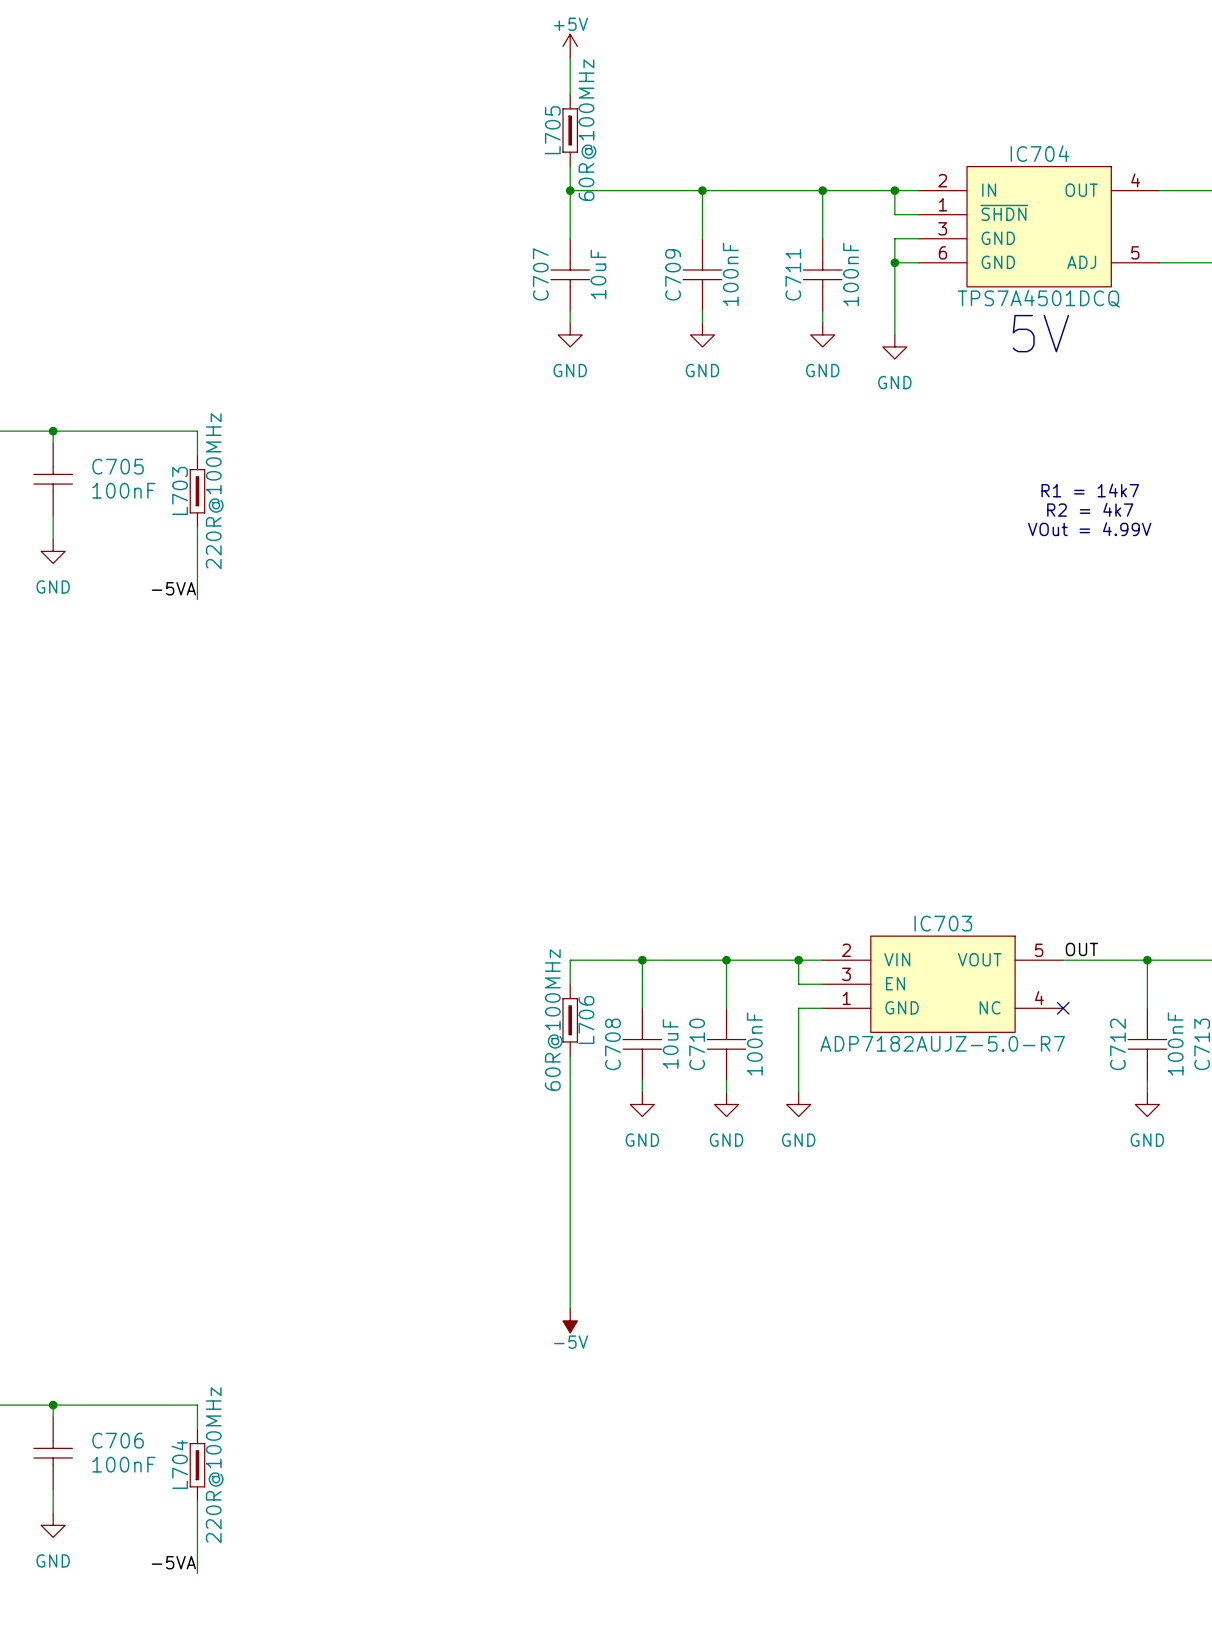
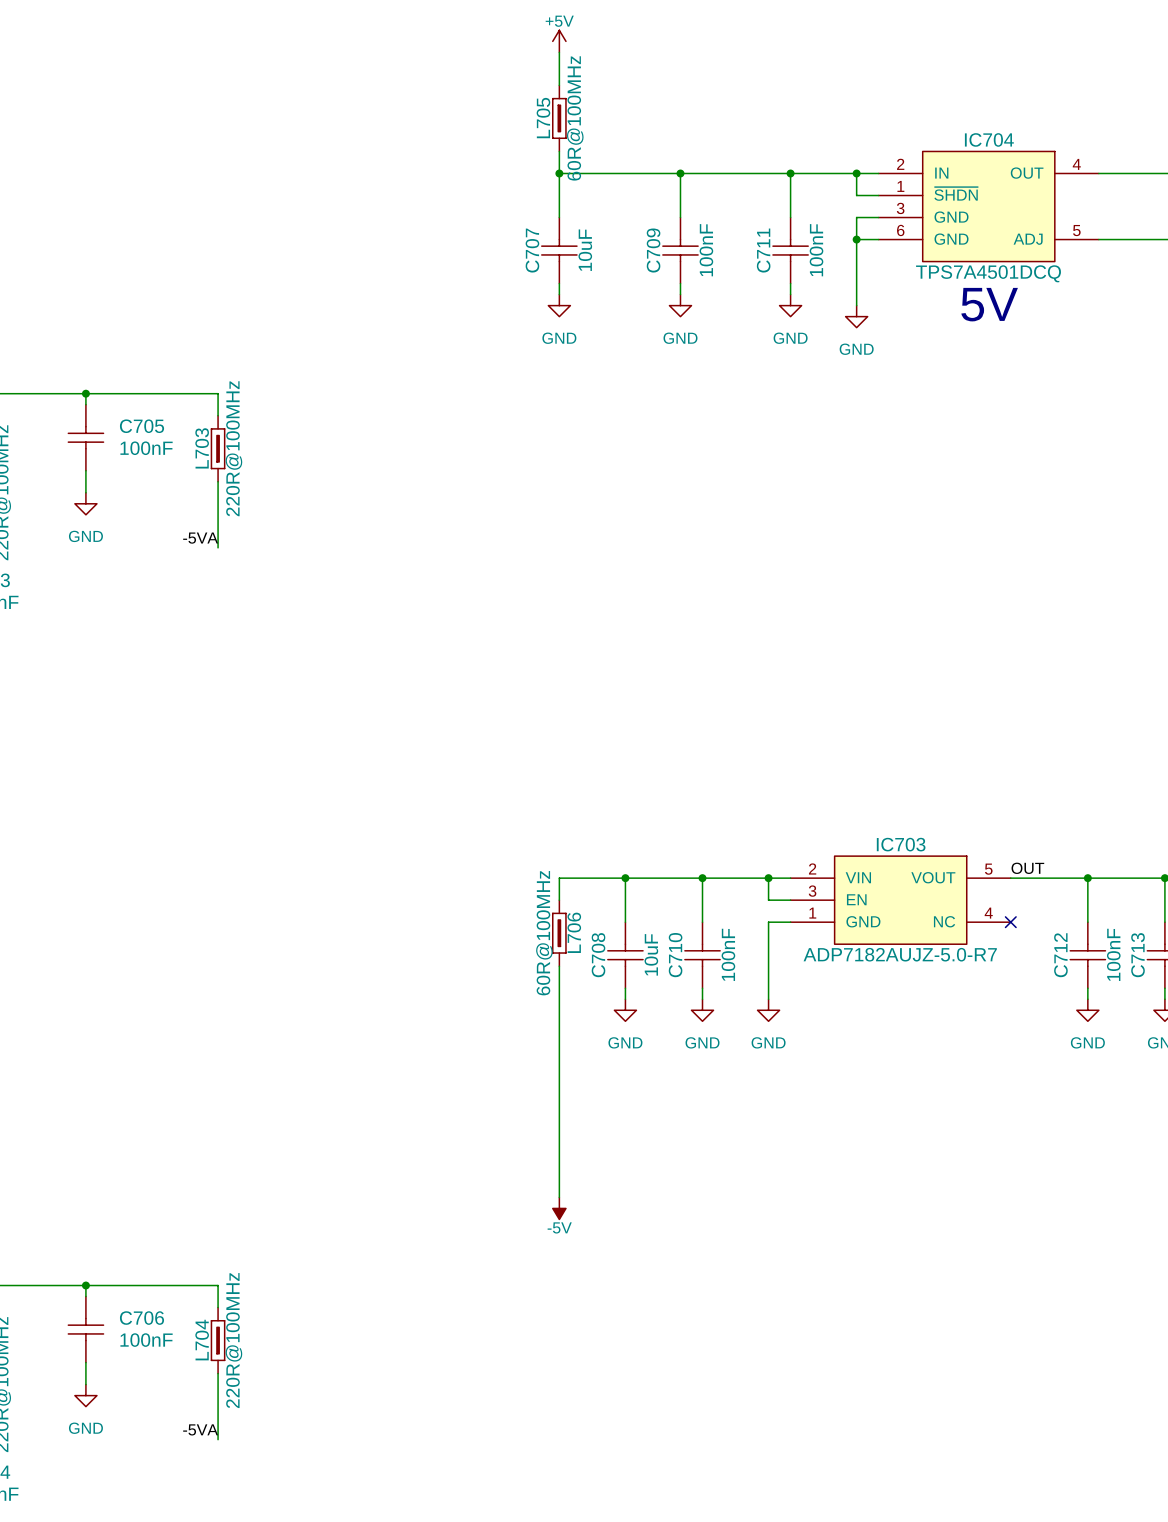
text: R1 = 14k7 (1090, 490) -> none
text: R2 = 4k7 (1090, 509) -> none
text: VOut = 4.99V (1089, 529) -> none

